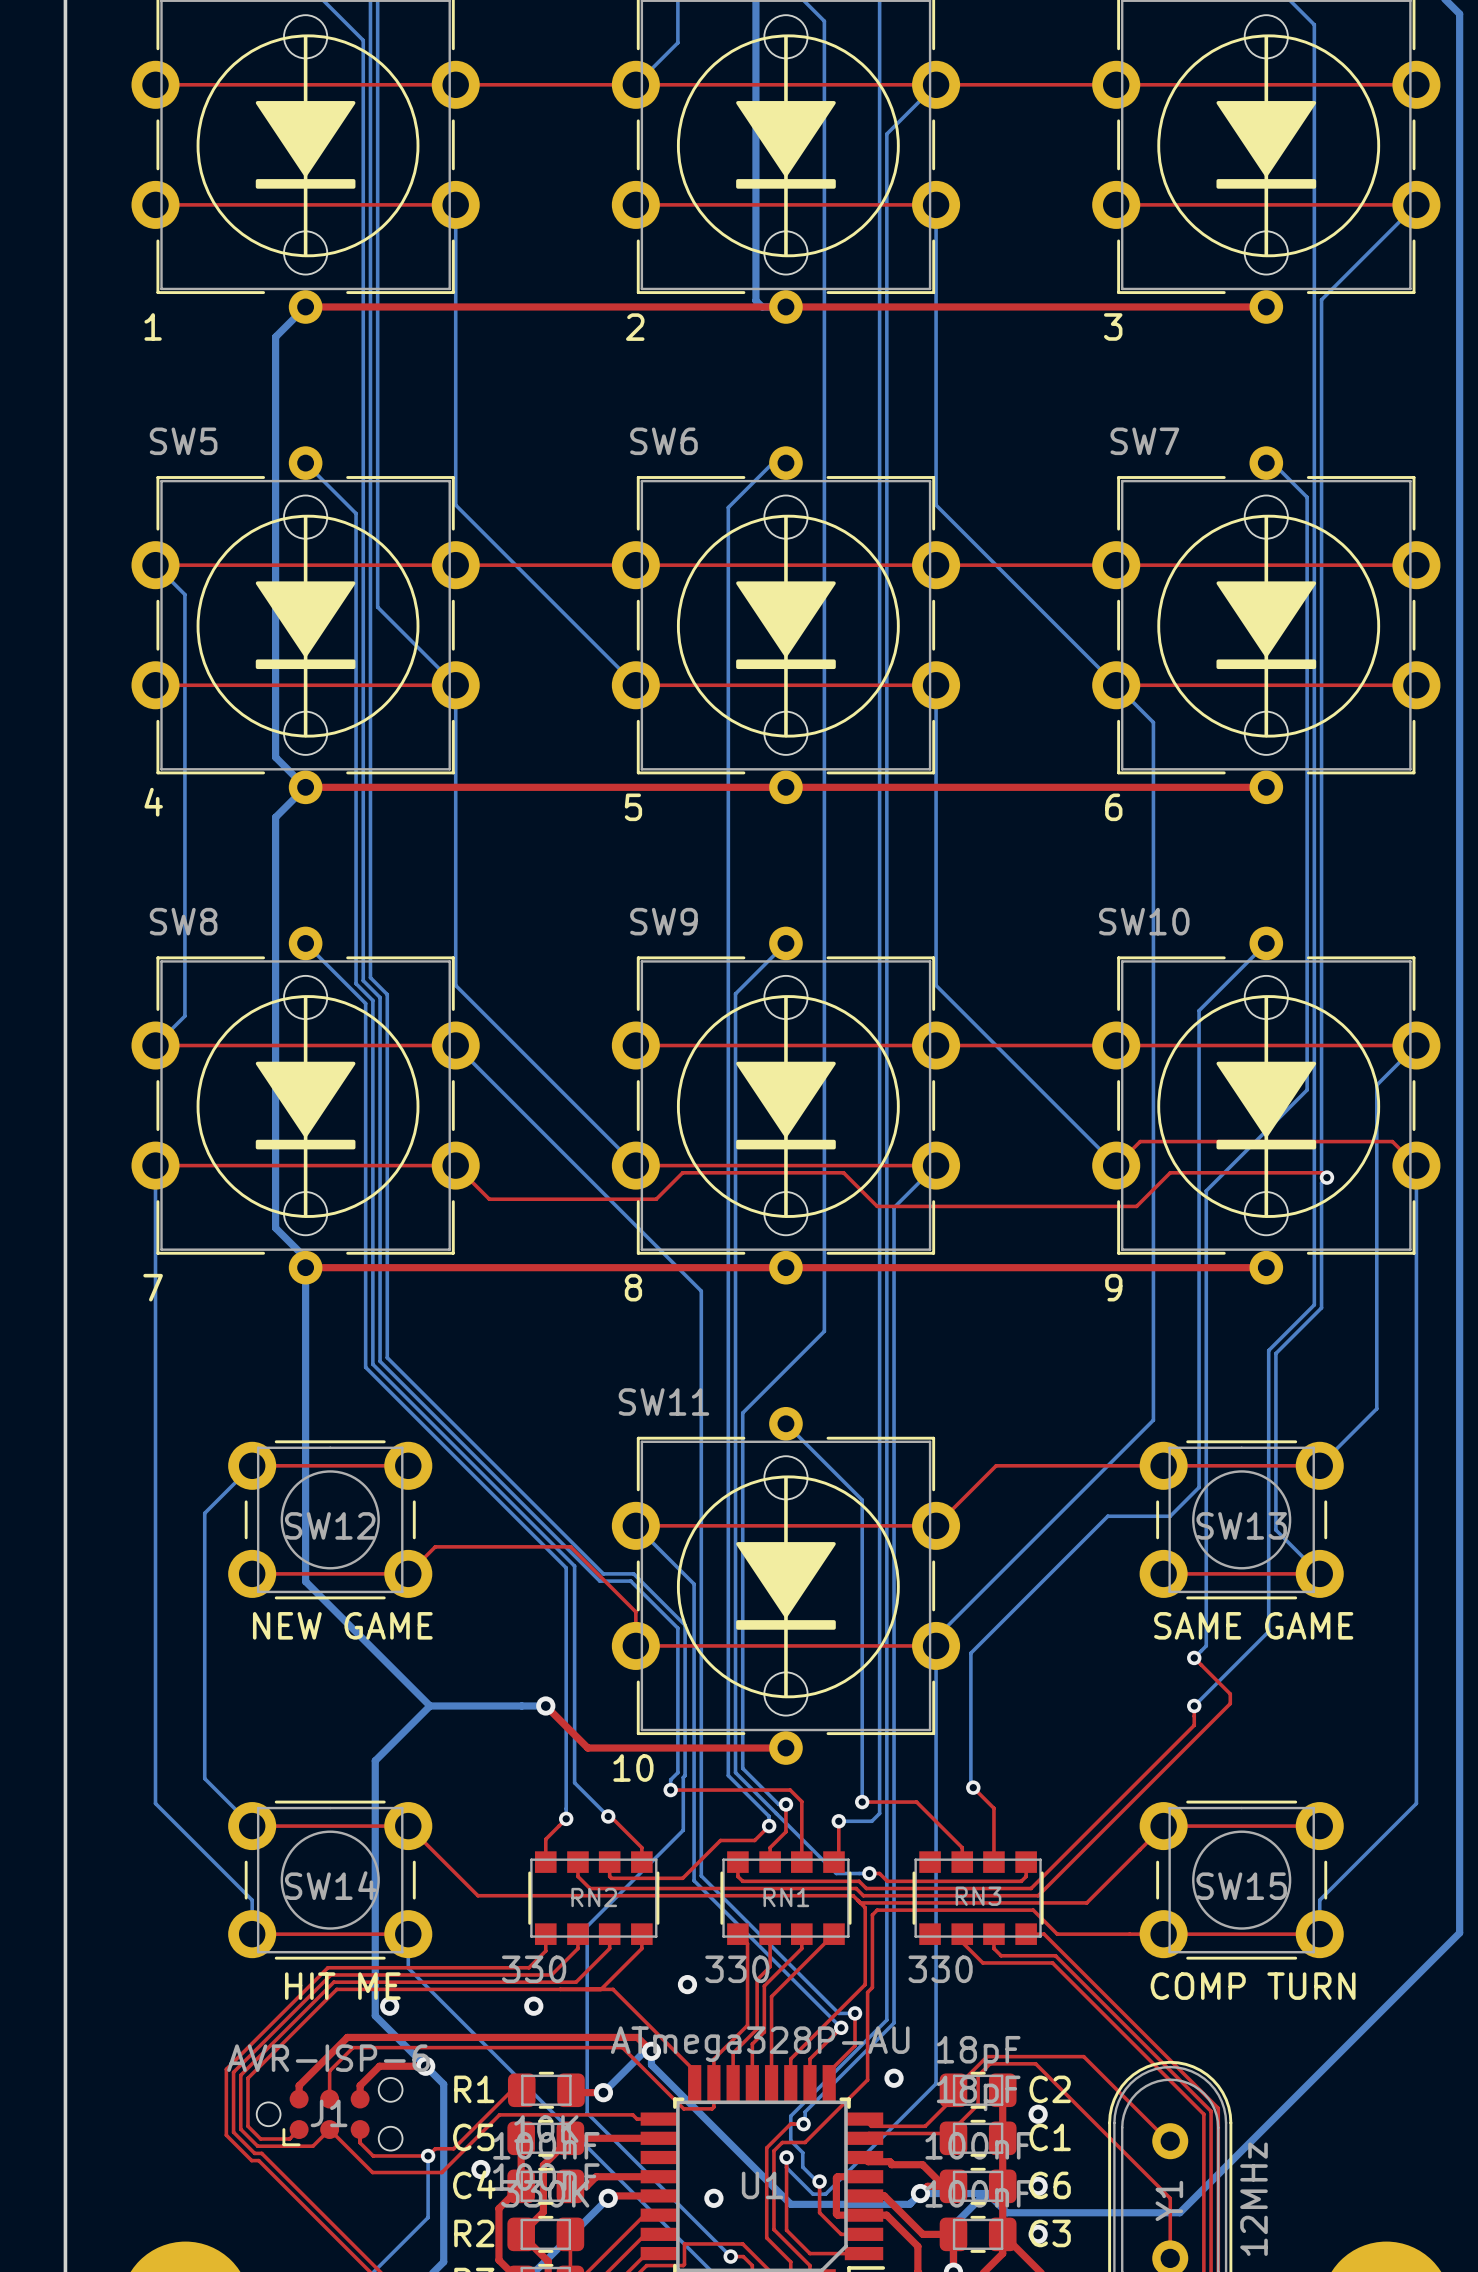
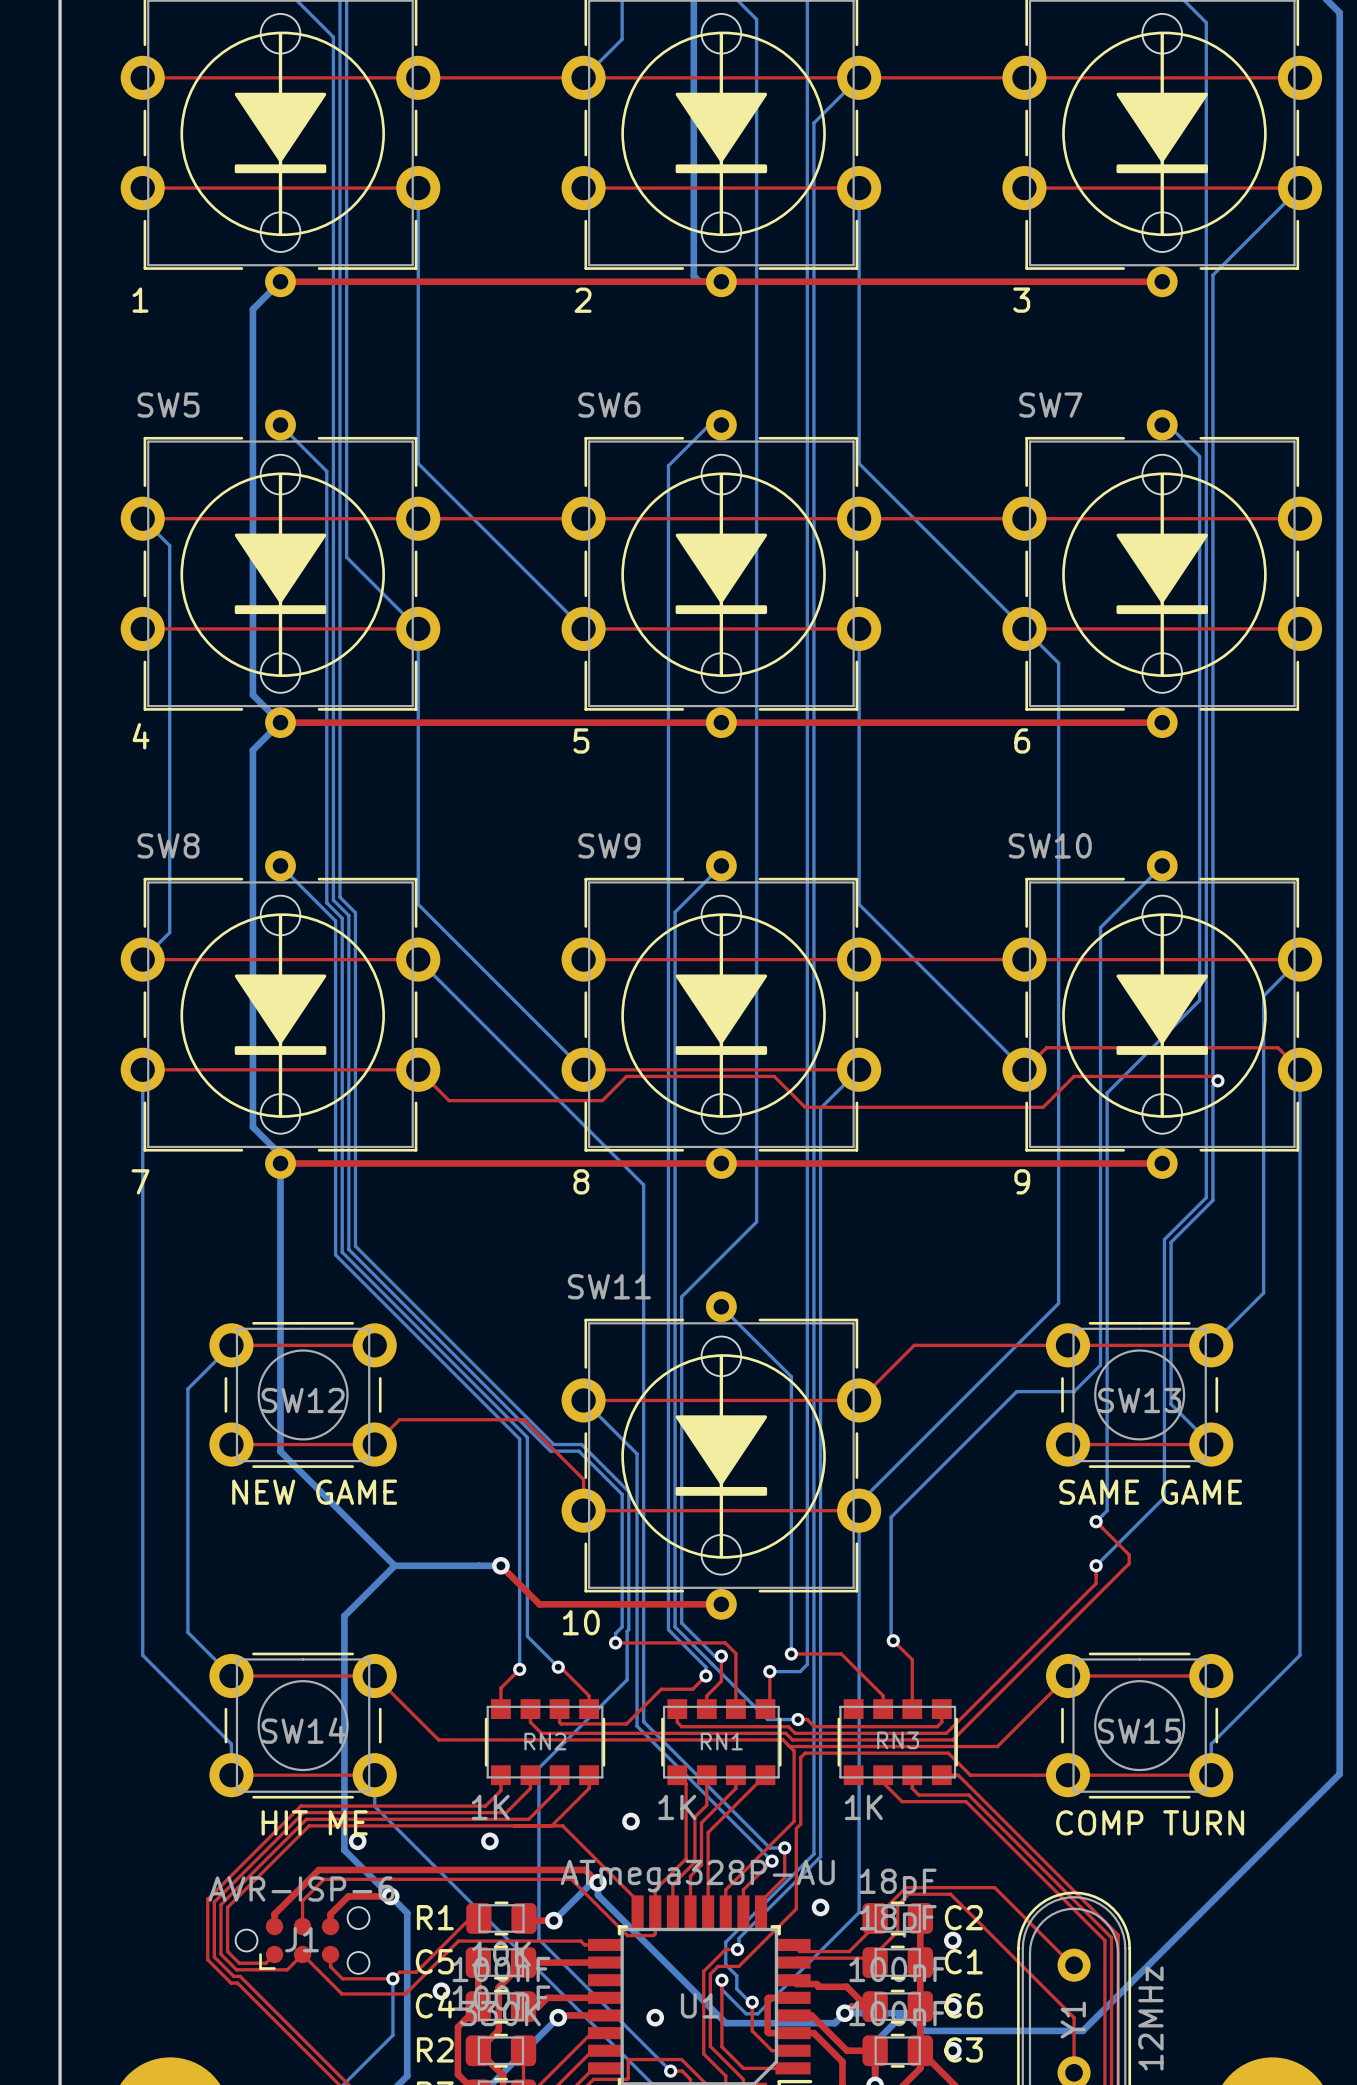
RN2 value: 330 (534, 1969) -> 1K (490, 1807)
RN1 value: 330 (737, 1969) -> 1K (677, 1807)
RN3 value: 330 (940, 1969) -> 1K (863, 1807)

